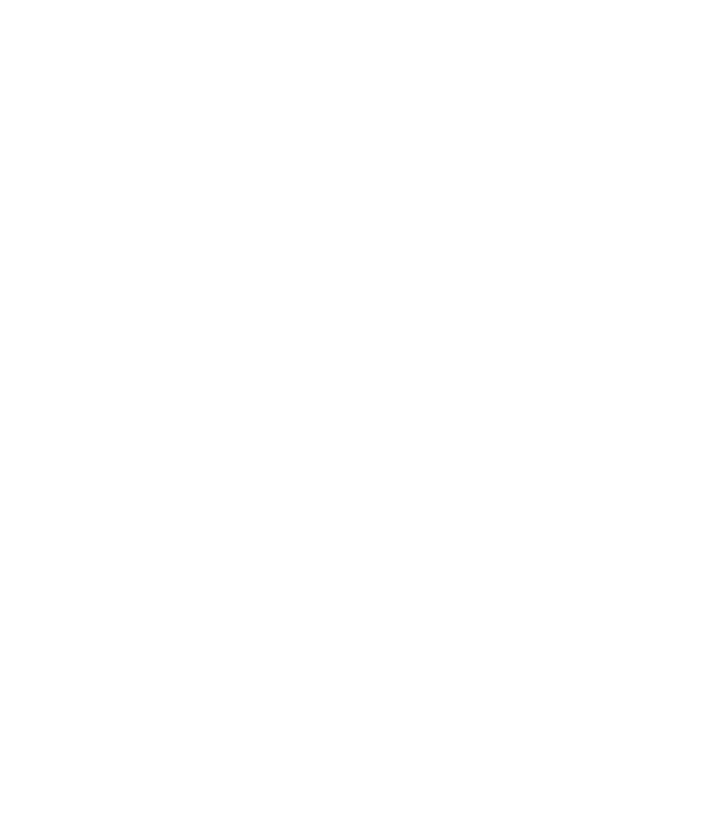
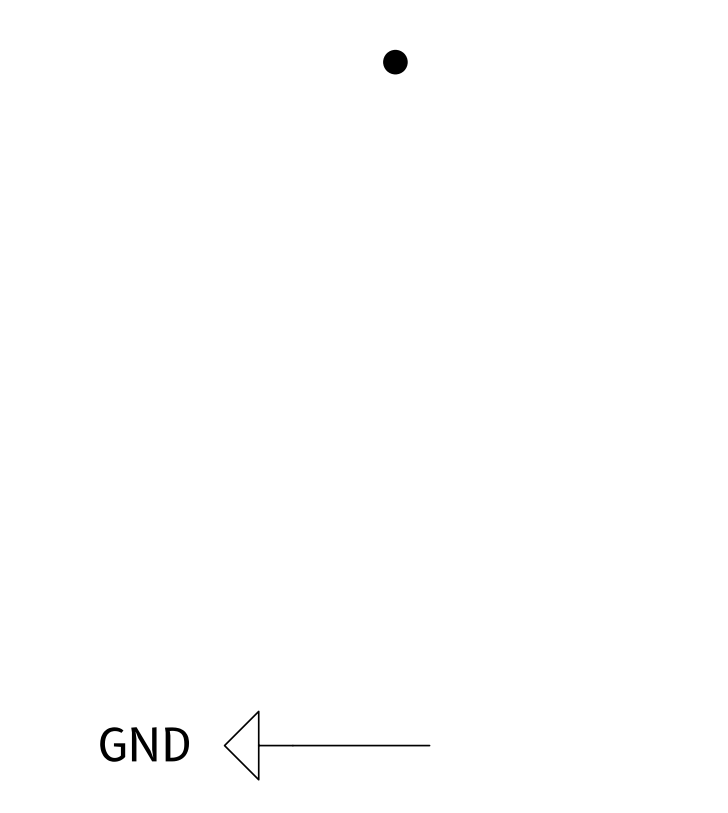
junction: none -> (395, 62)
power symbol: none -> GND (258, 745)
wire: none -> (292, 745) (429, 745)

